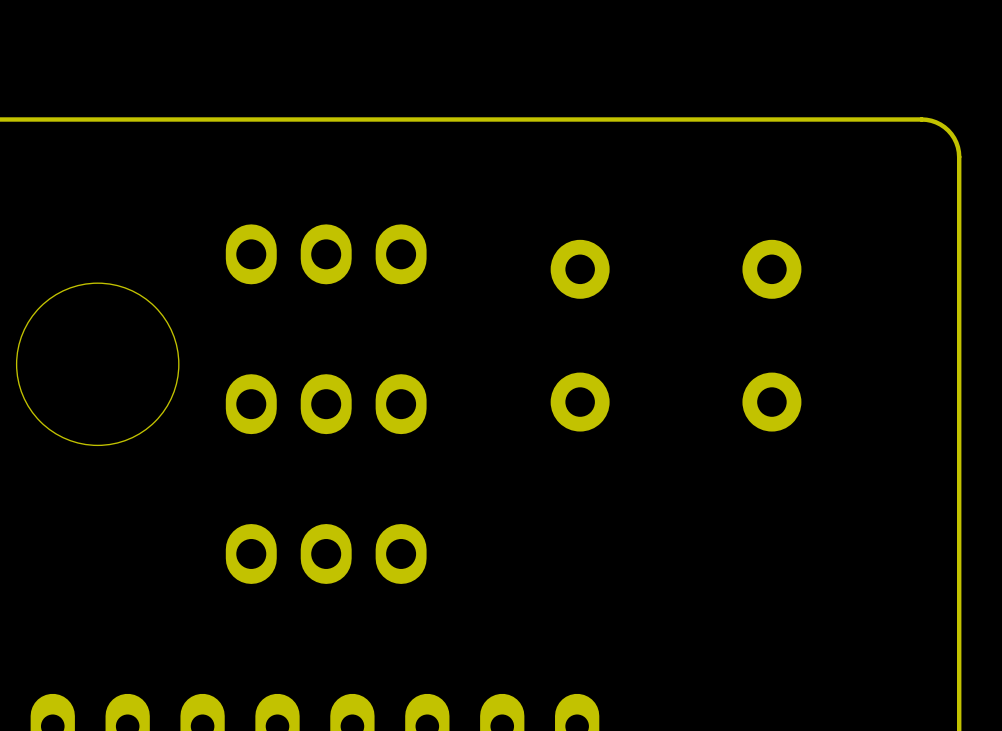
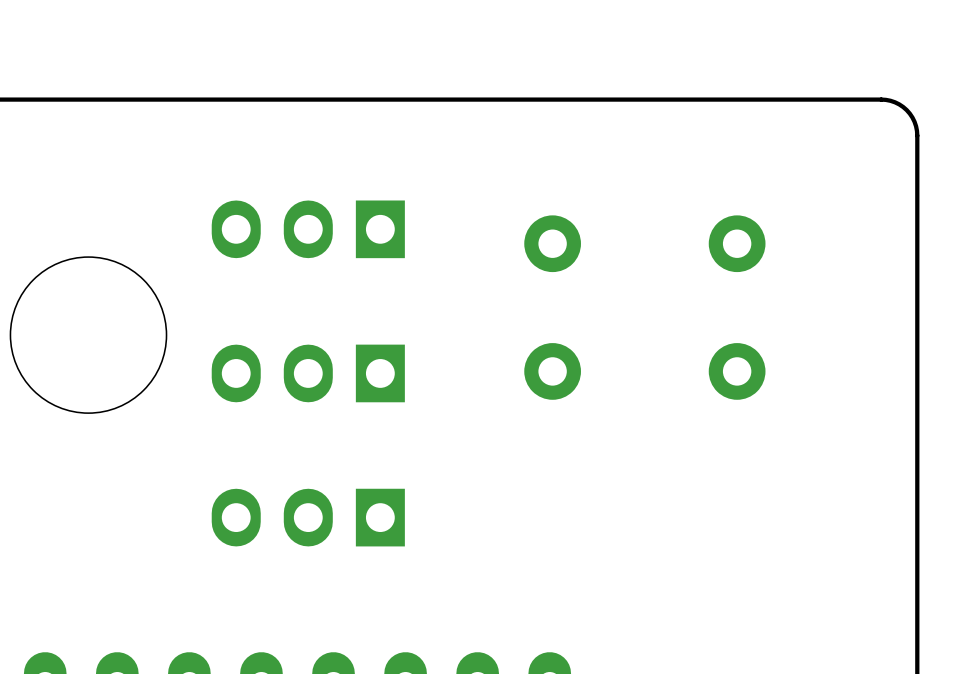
part footprint: [225, 224, 427, 285] -> [211, 200, 405, 259]
part footprint: [225, 374, 427, 435] -> [211, 344, 405, 403]
part footprint: [225, 524, 427, 584] -> [211, 488, 405, 547]

